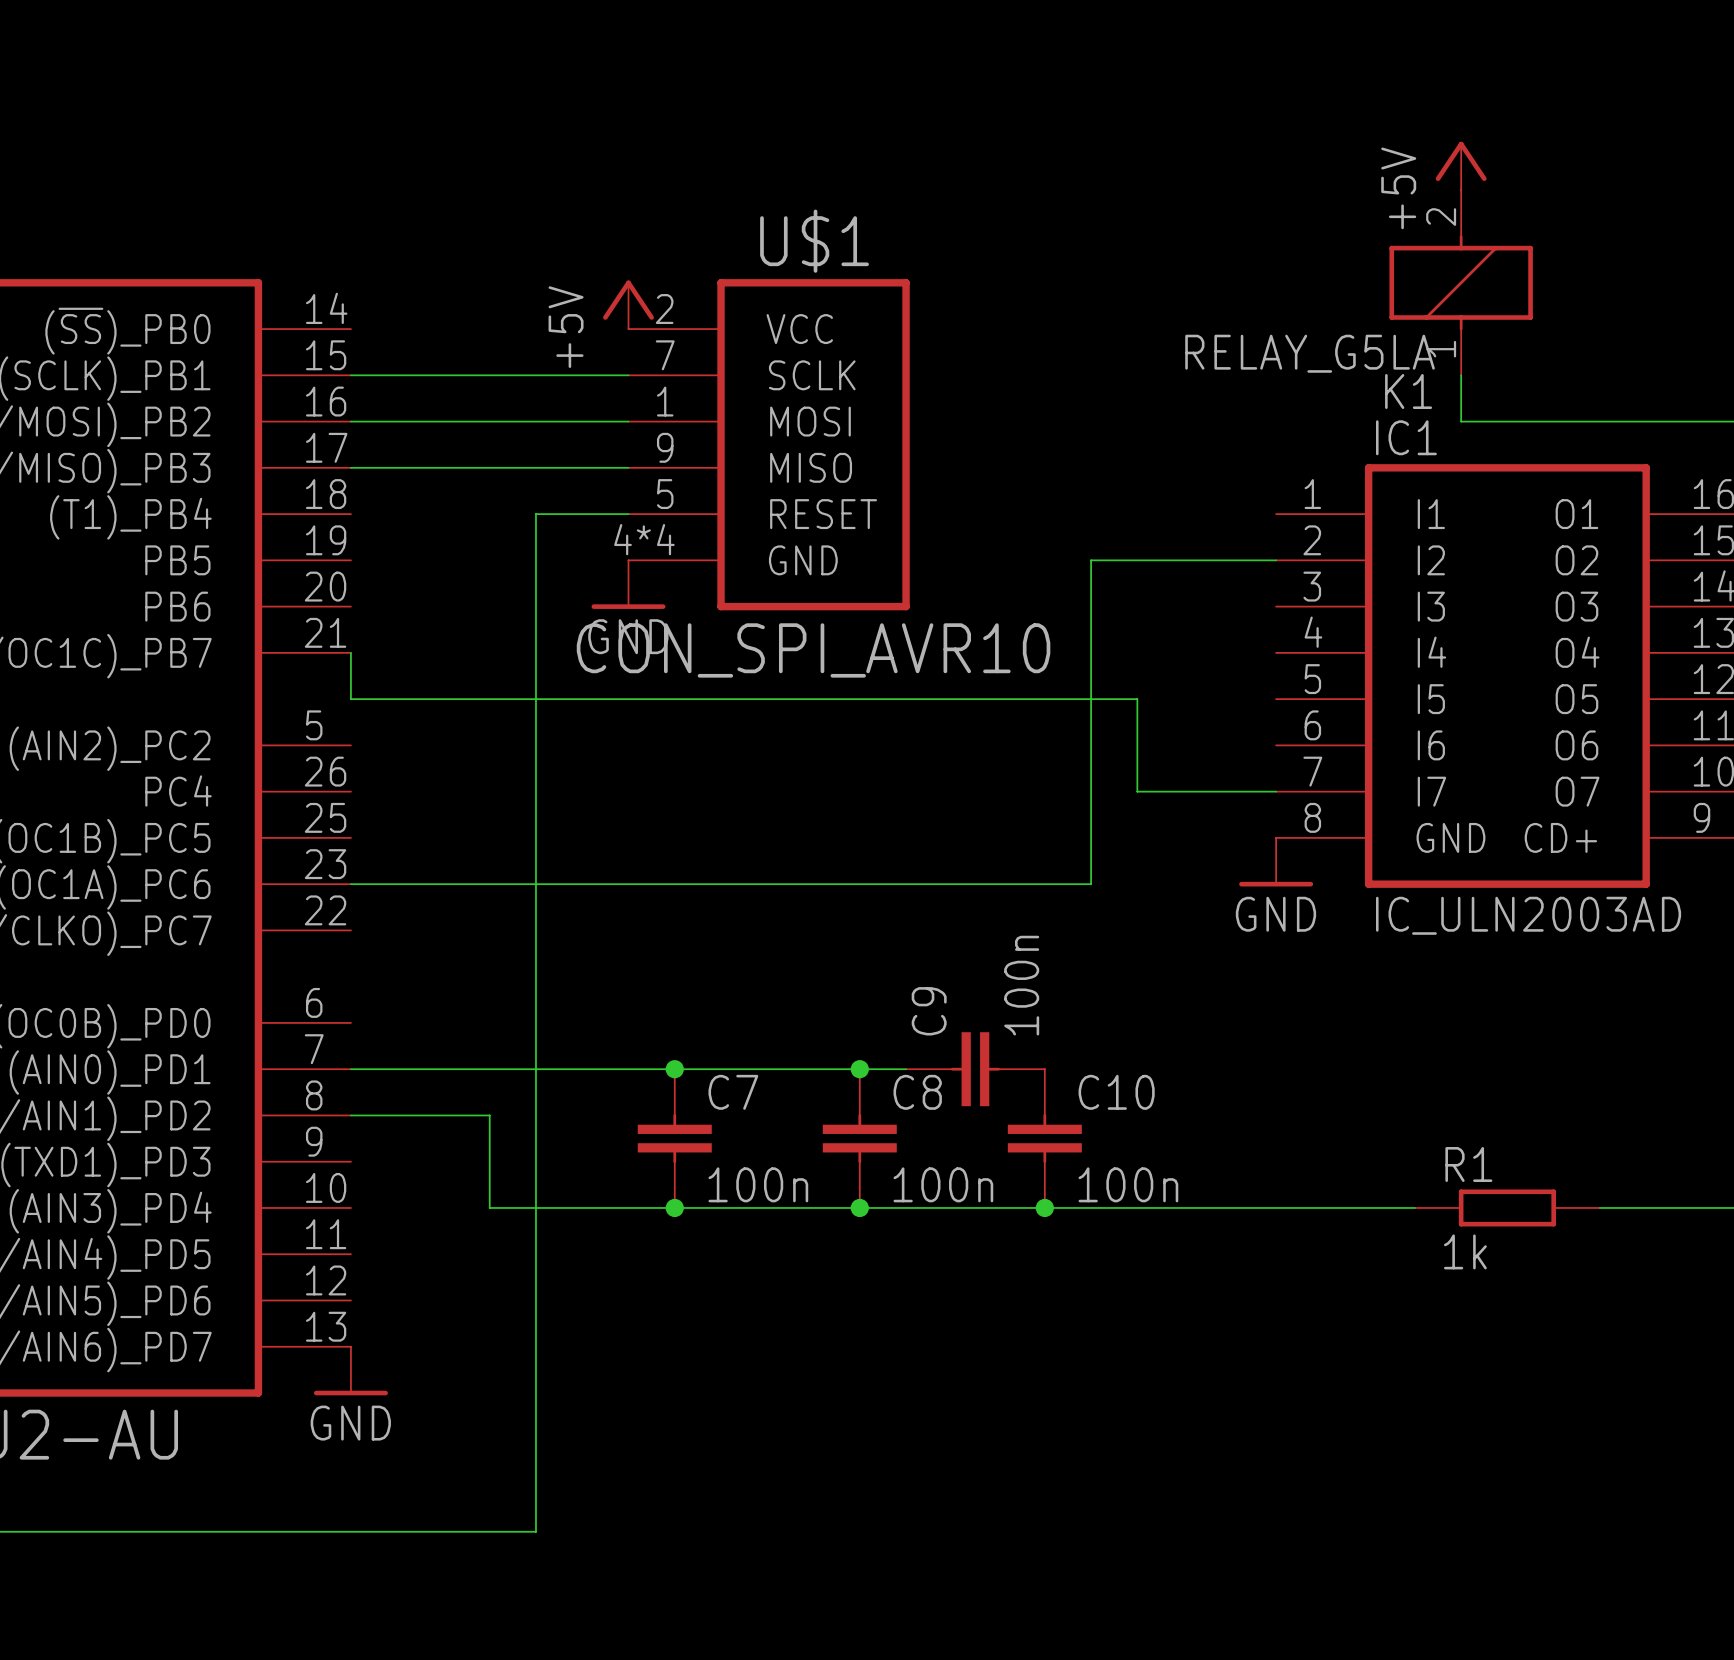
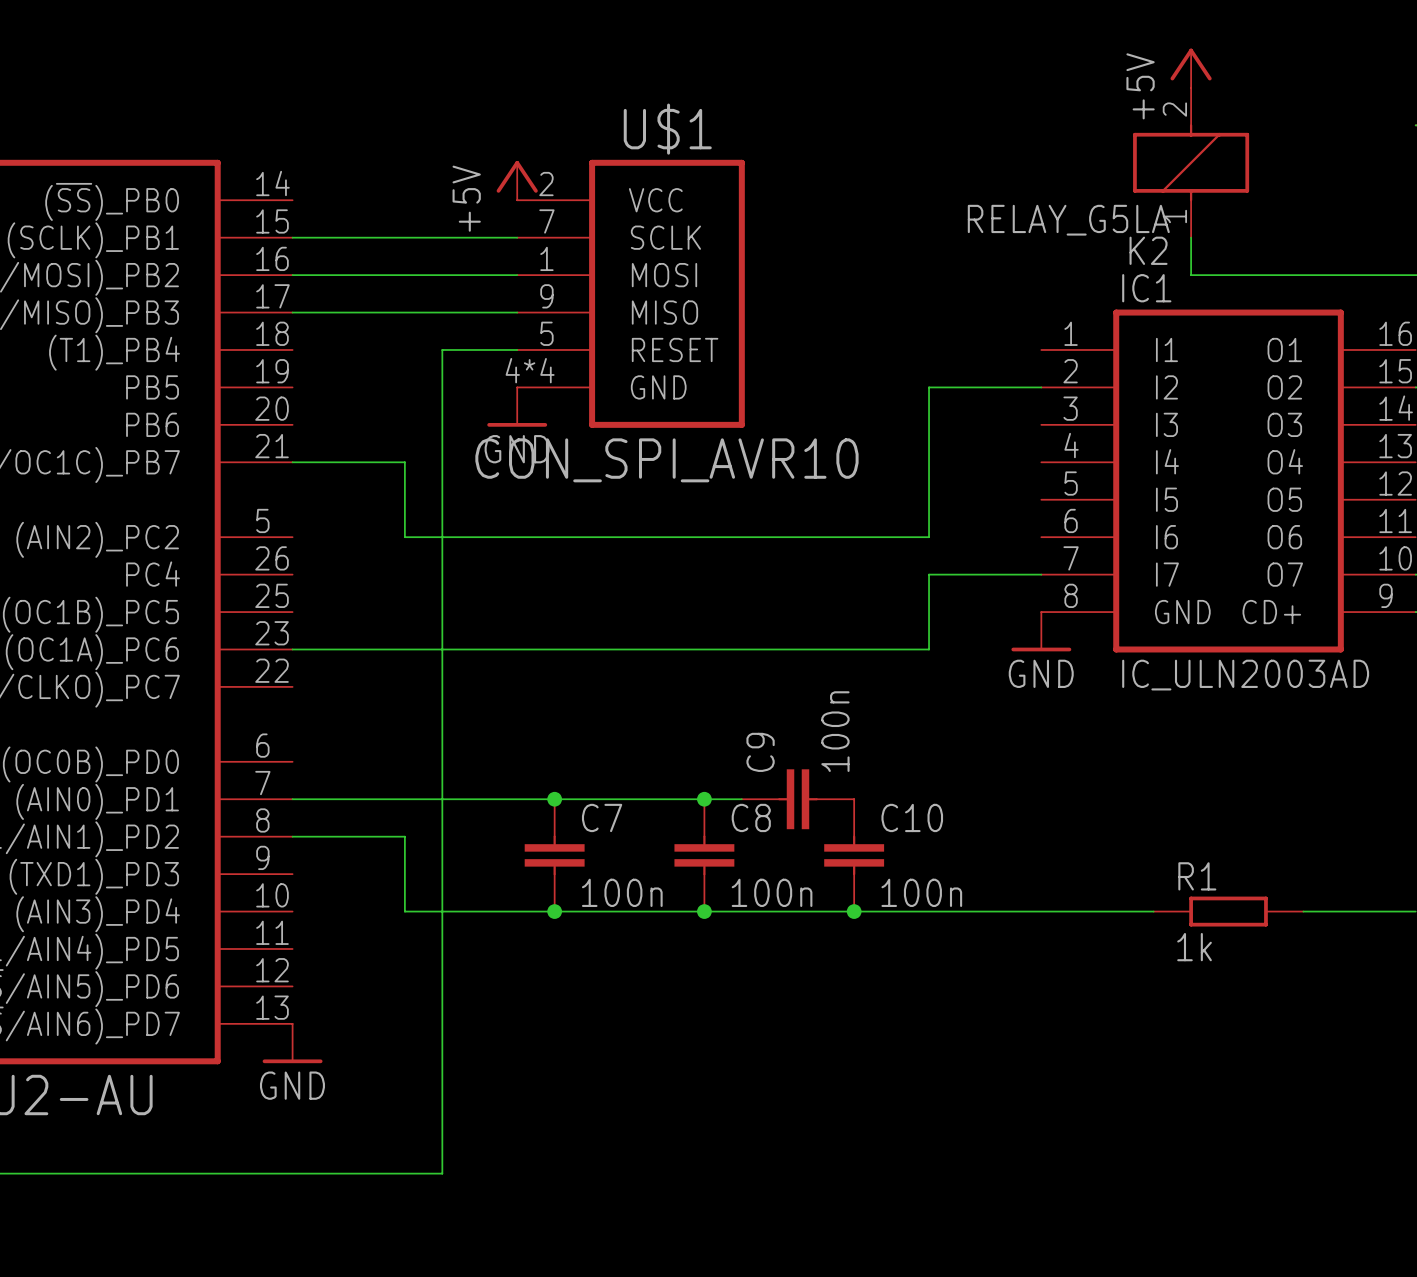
K1 name: K1 (1408, 391) -> K2 (1148, 250)
wire: (1137, 560) (1091, 560) (1091, 884) -> (929, 387) (929, 499)
wire: (350, 652) (350, 699) (1137, 699) -> (292, 462) (404, 462) (404, 537) (929, 537)
wire: (1137, 745) (1137, 791) -> (891, 649) (929, 649) (929, 574)

